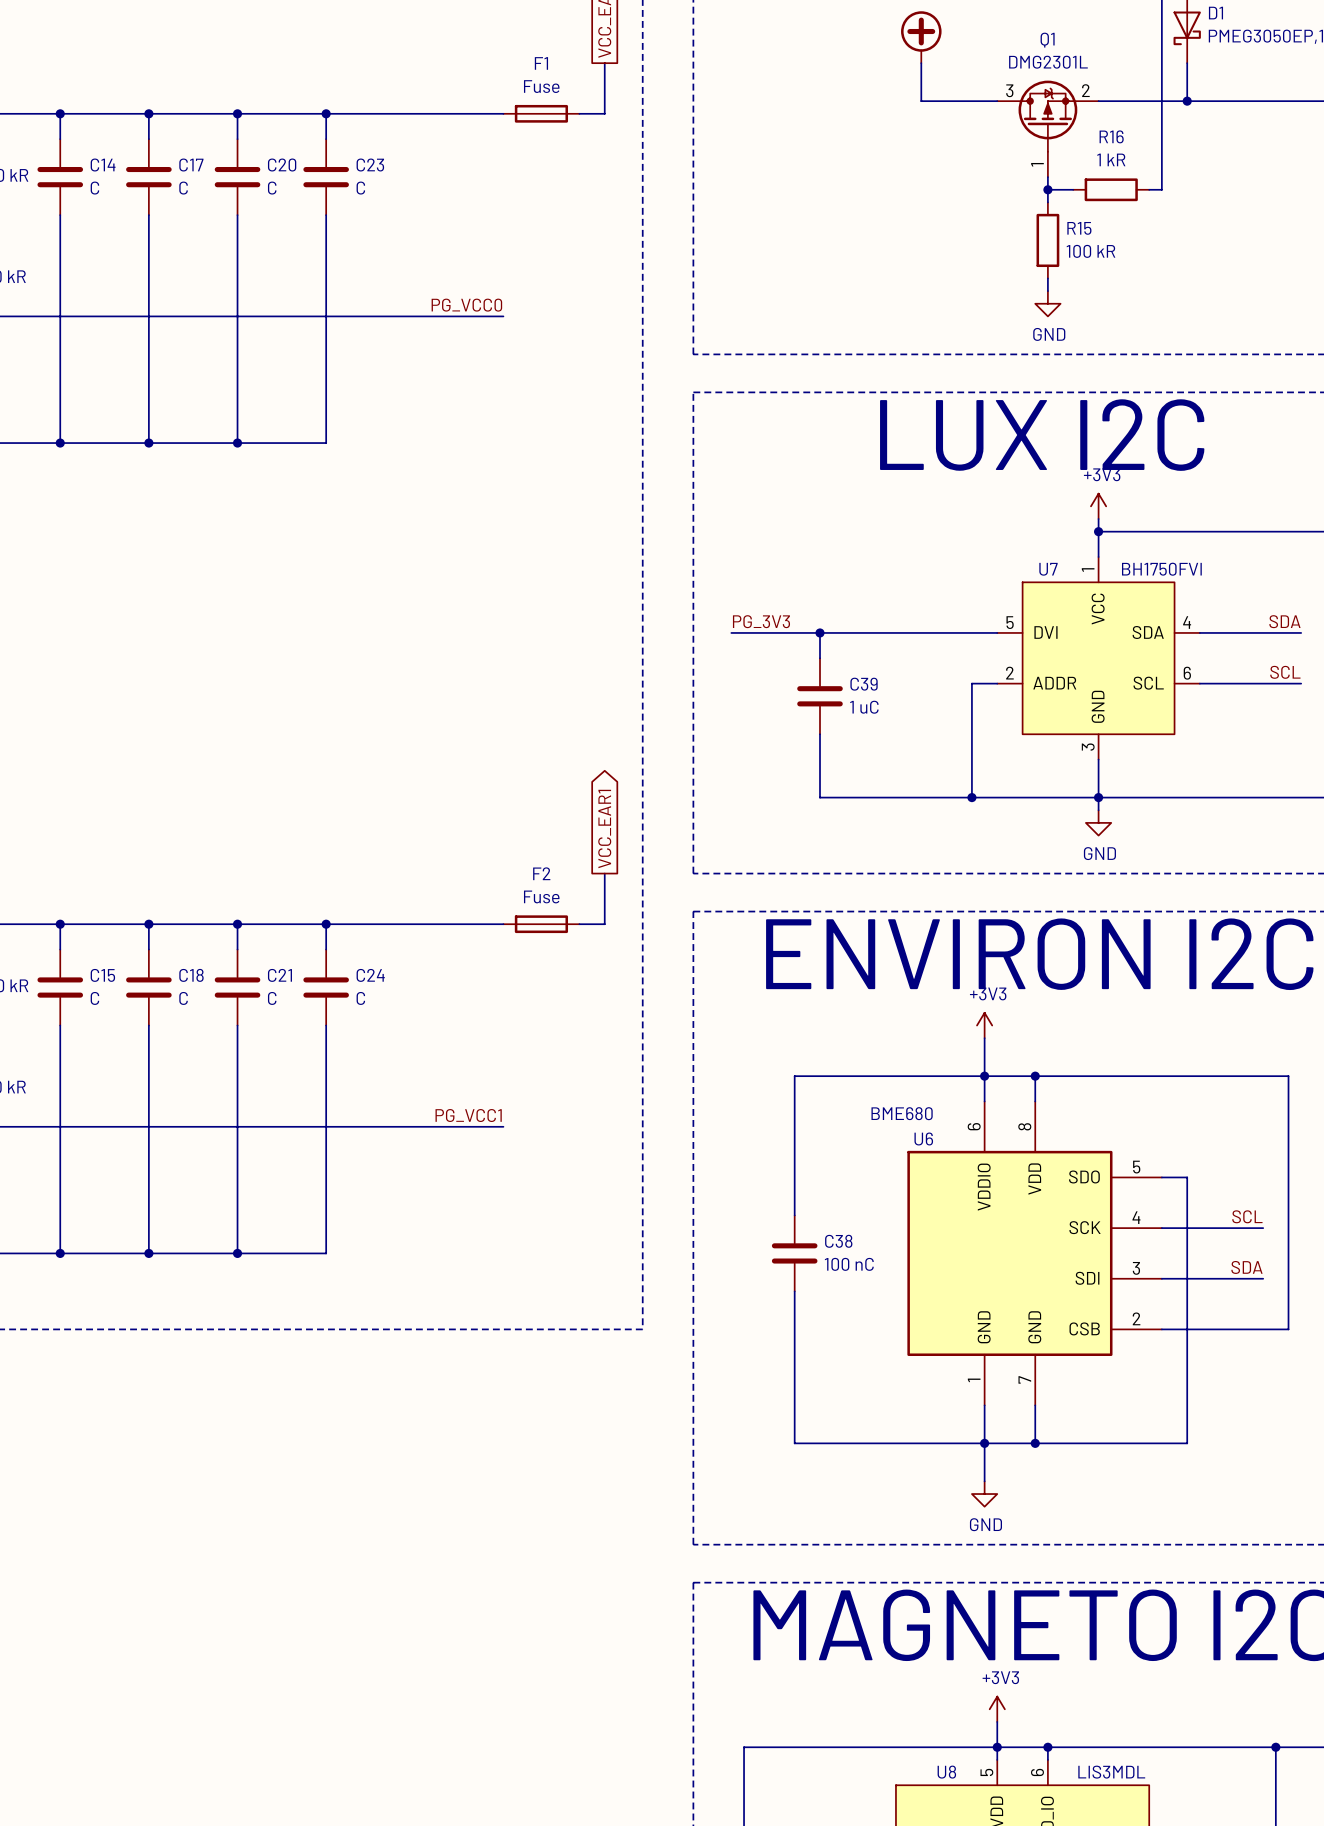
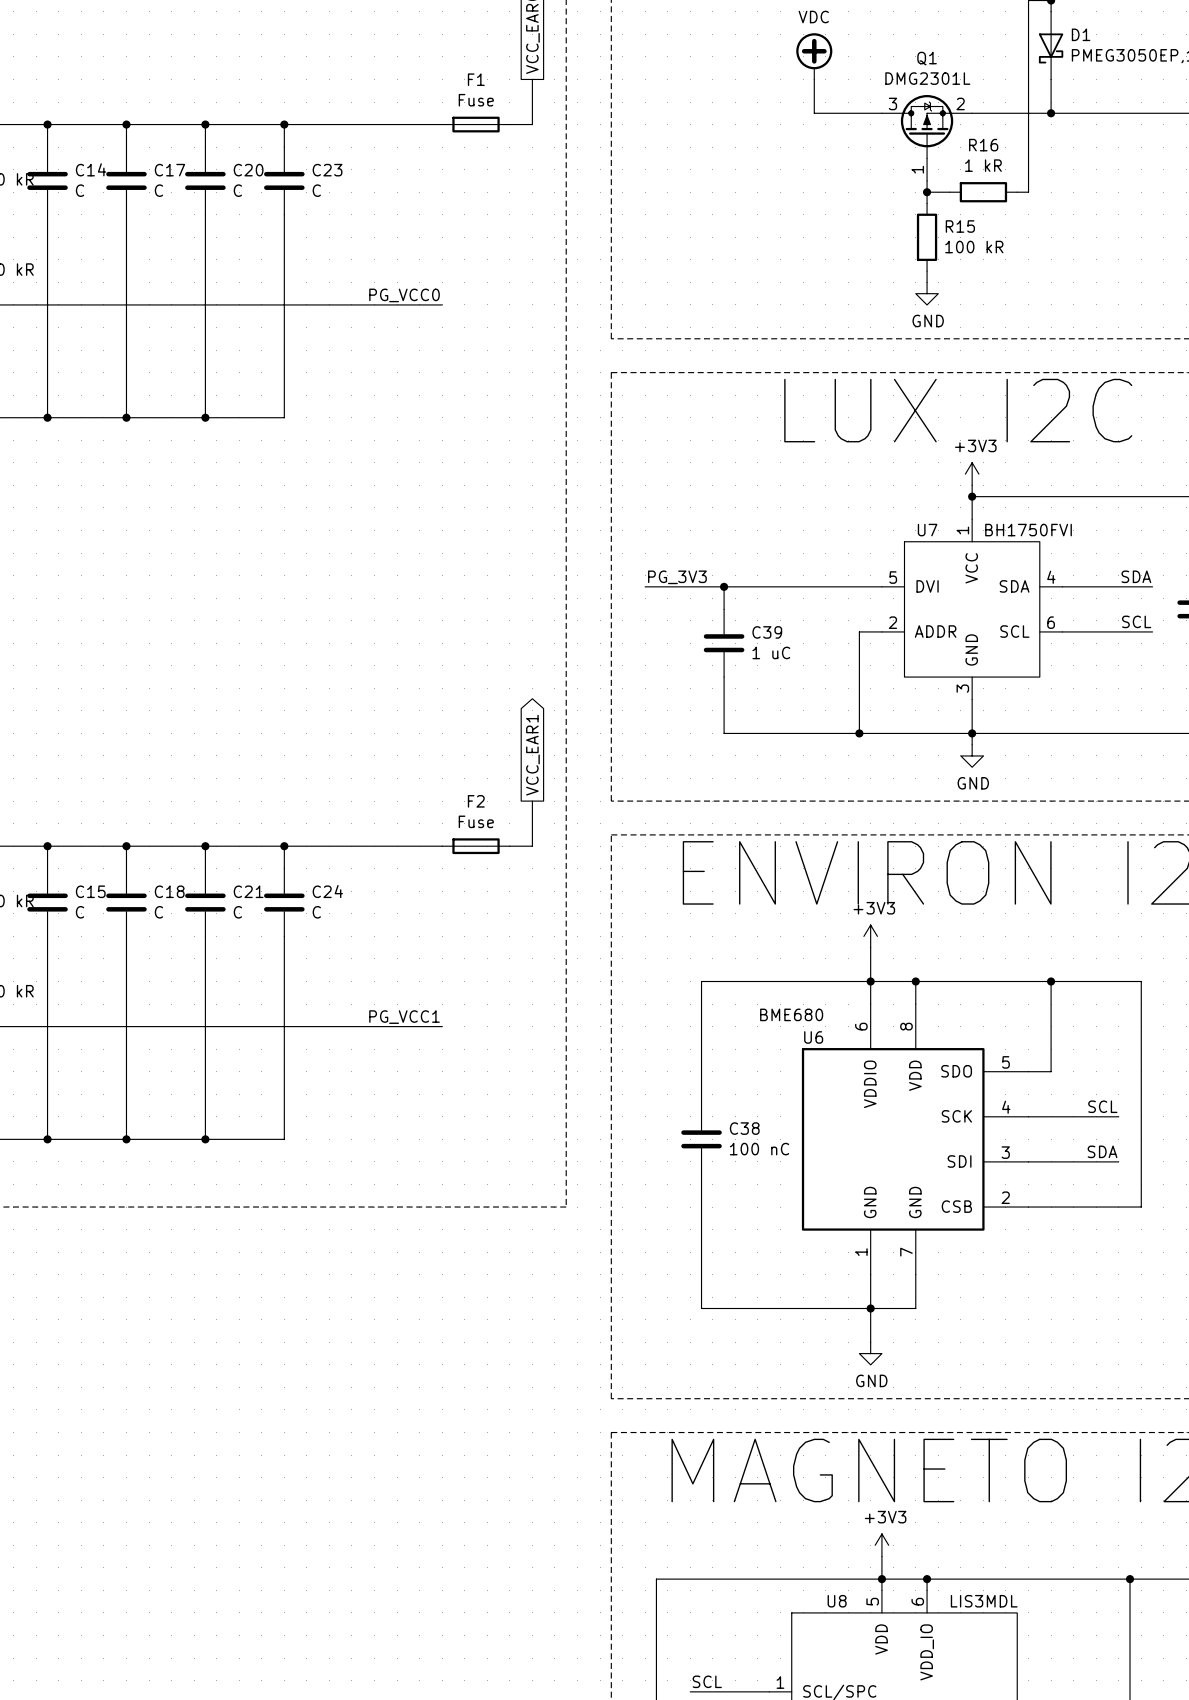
junction: none -> (1051, 981)
wire: (1187, 1177) (1187, 1443) (1035, 1443) -> (1051, 1071) (1051, 981)
junction: (1035, 1443) -> none

